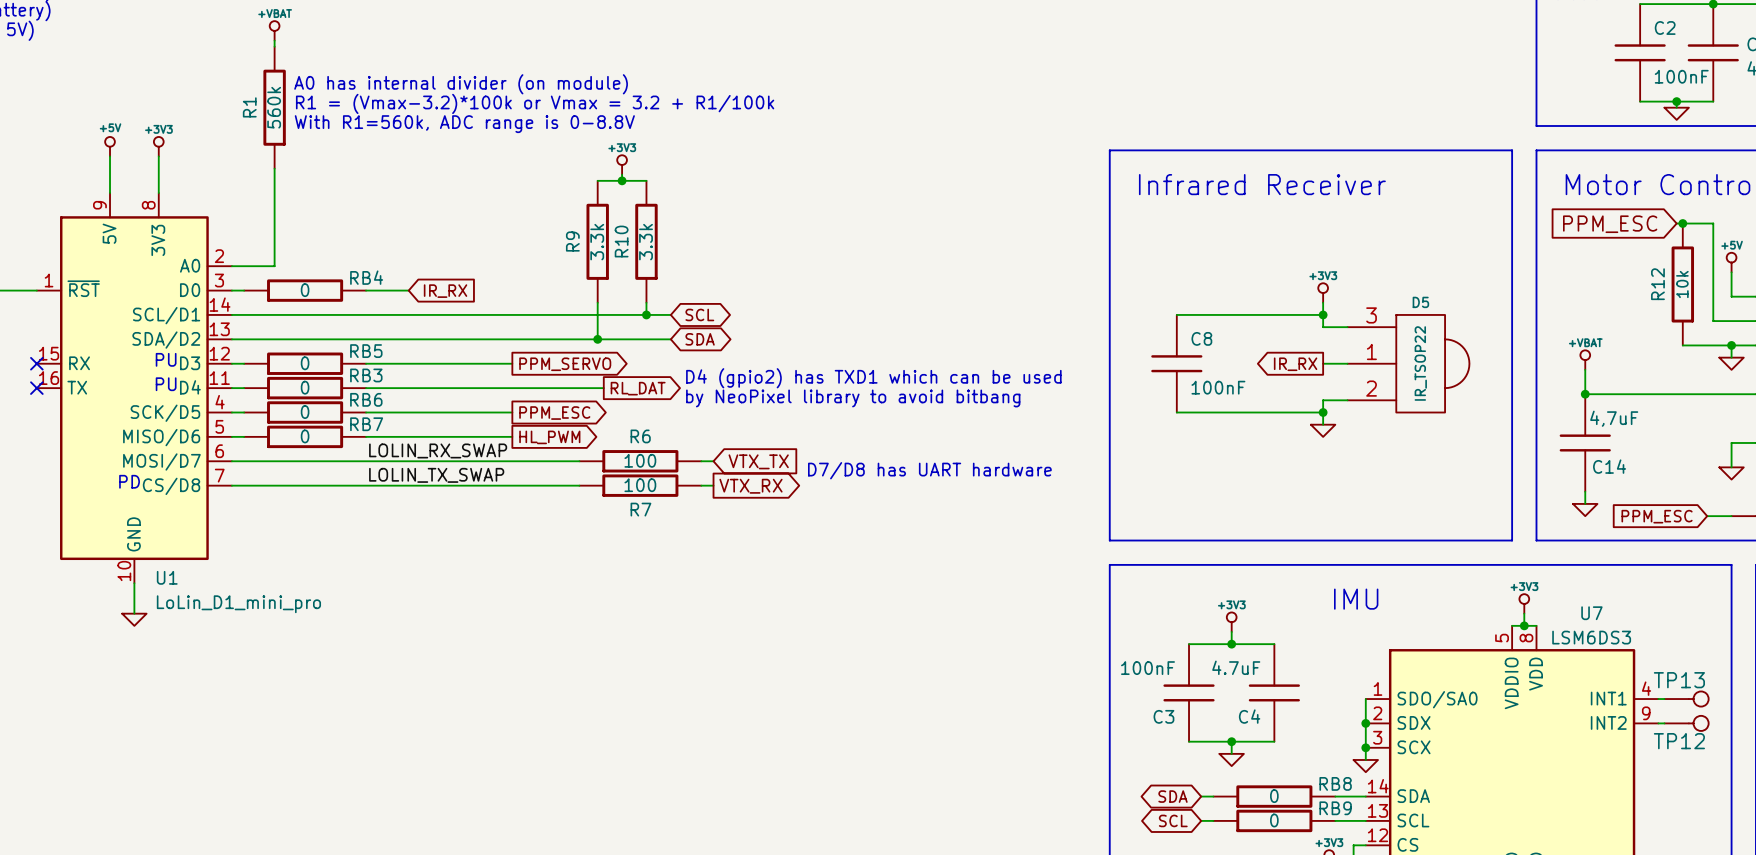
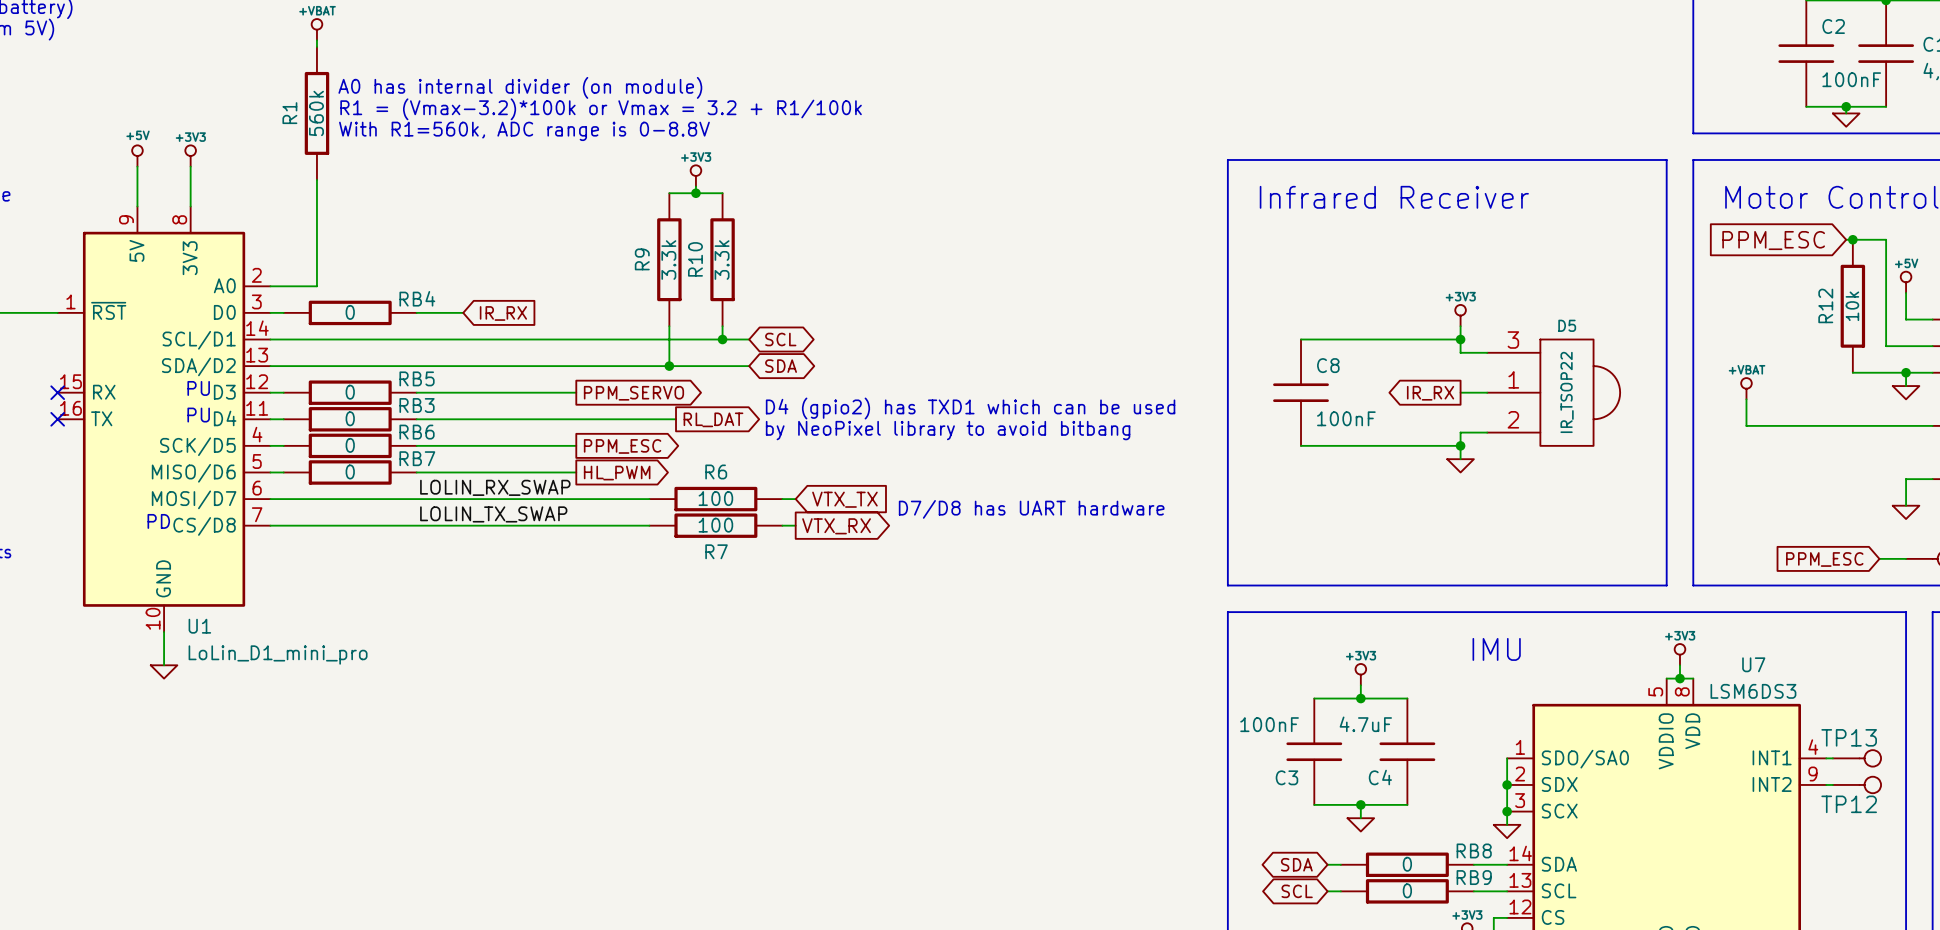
junction: (1585, 394) -> none
C14: 4,7uF (1585, 442) -> none
wire: (1585, 491) (1585, 503) -> none
power symbol: (1585, 510) -> none

